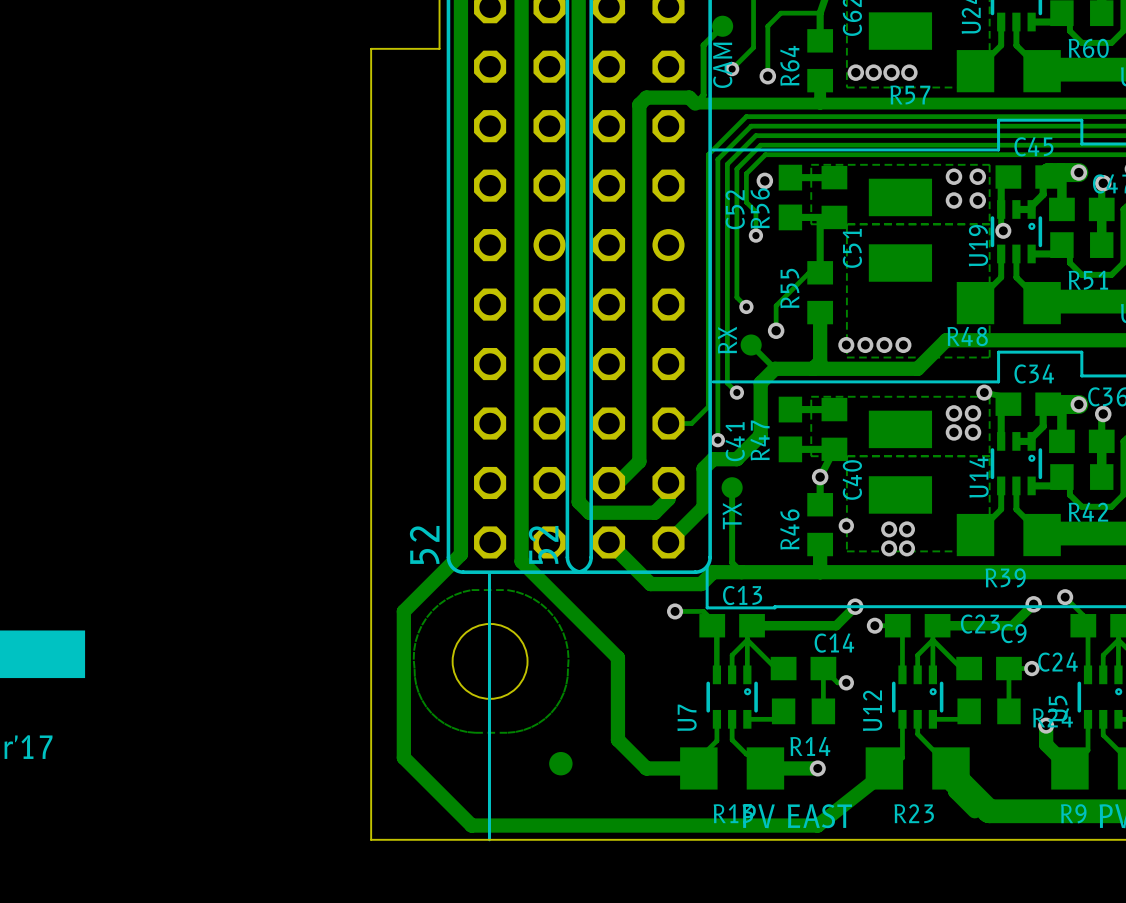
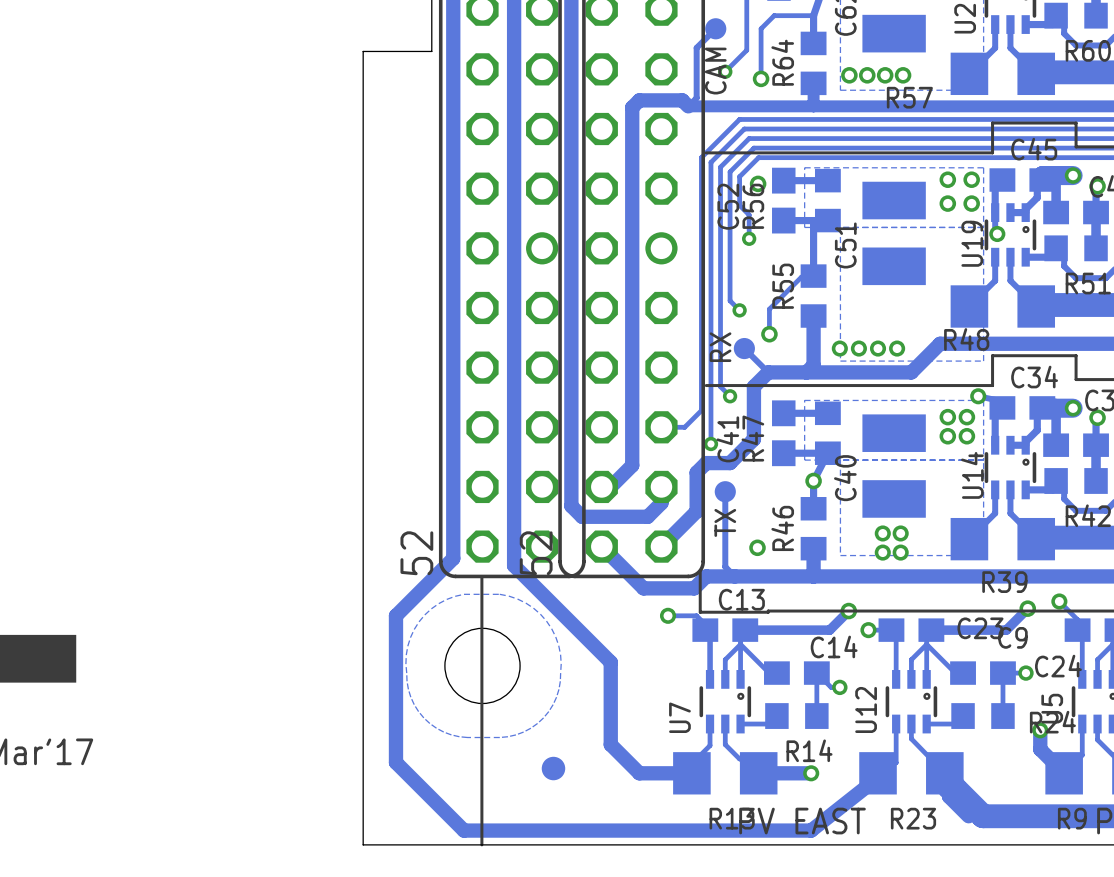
via: (846, 525) -> none
via: none -> (757, 547)

